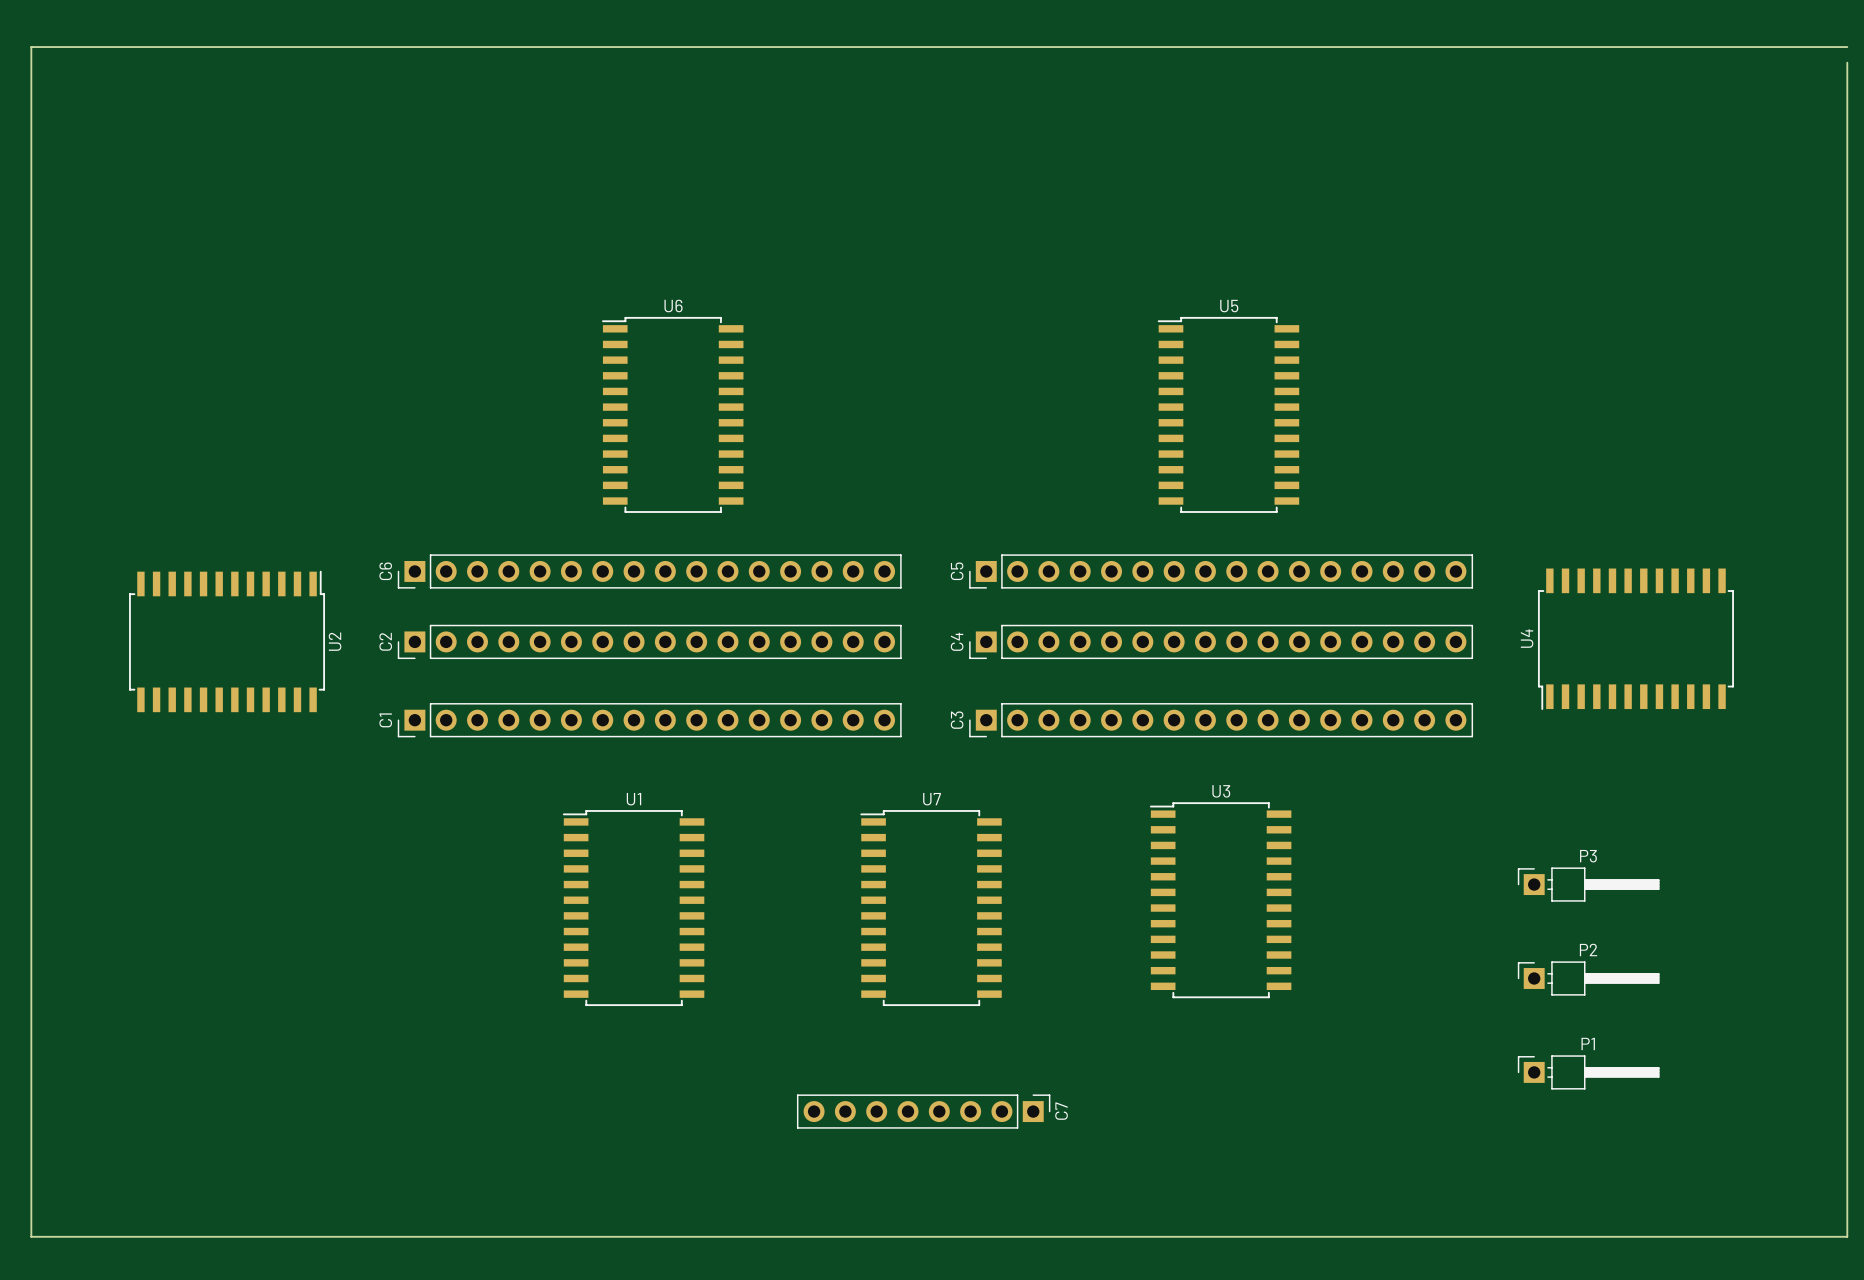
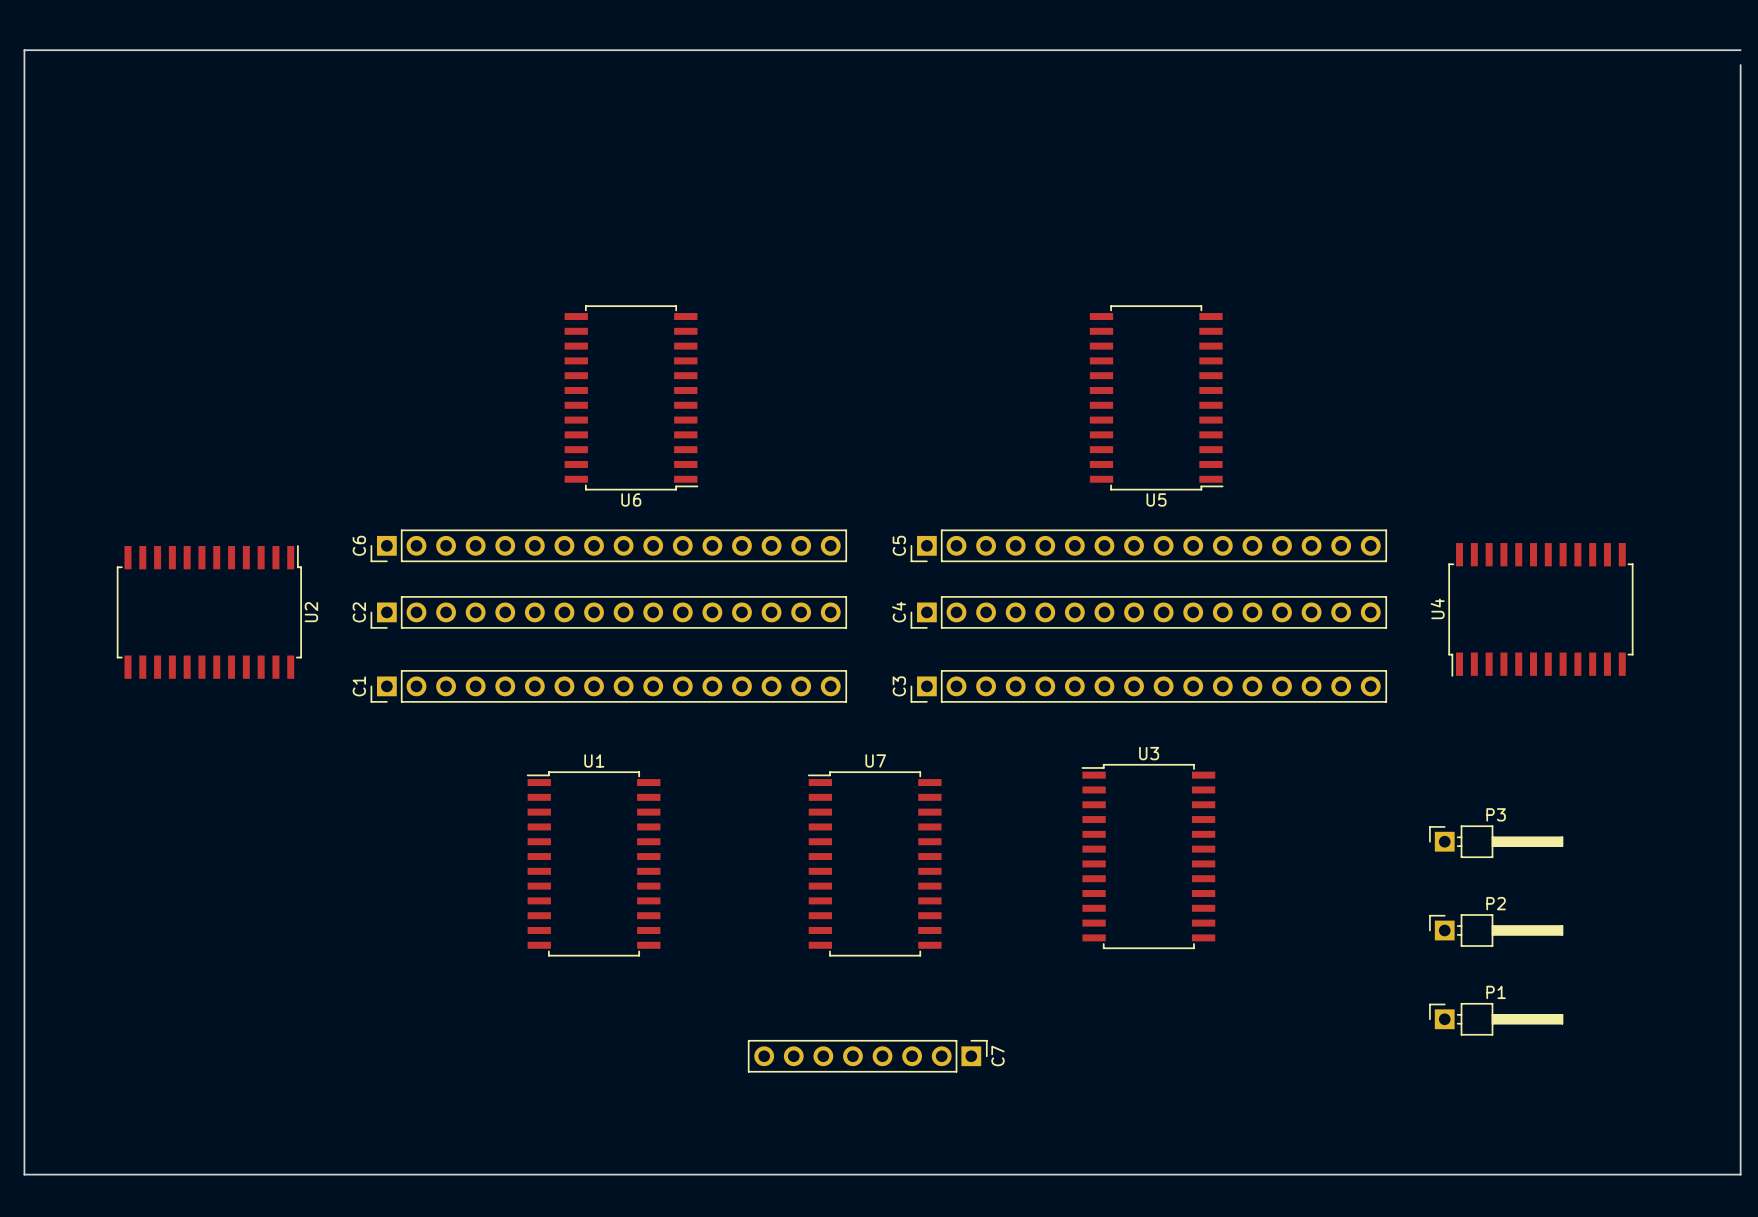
U6 rotation: 0° (672, 414) -> 180° (631, 397)
U5 rotation: 0° (1228, 414) -> 180° (1156, 397)

